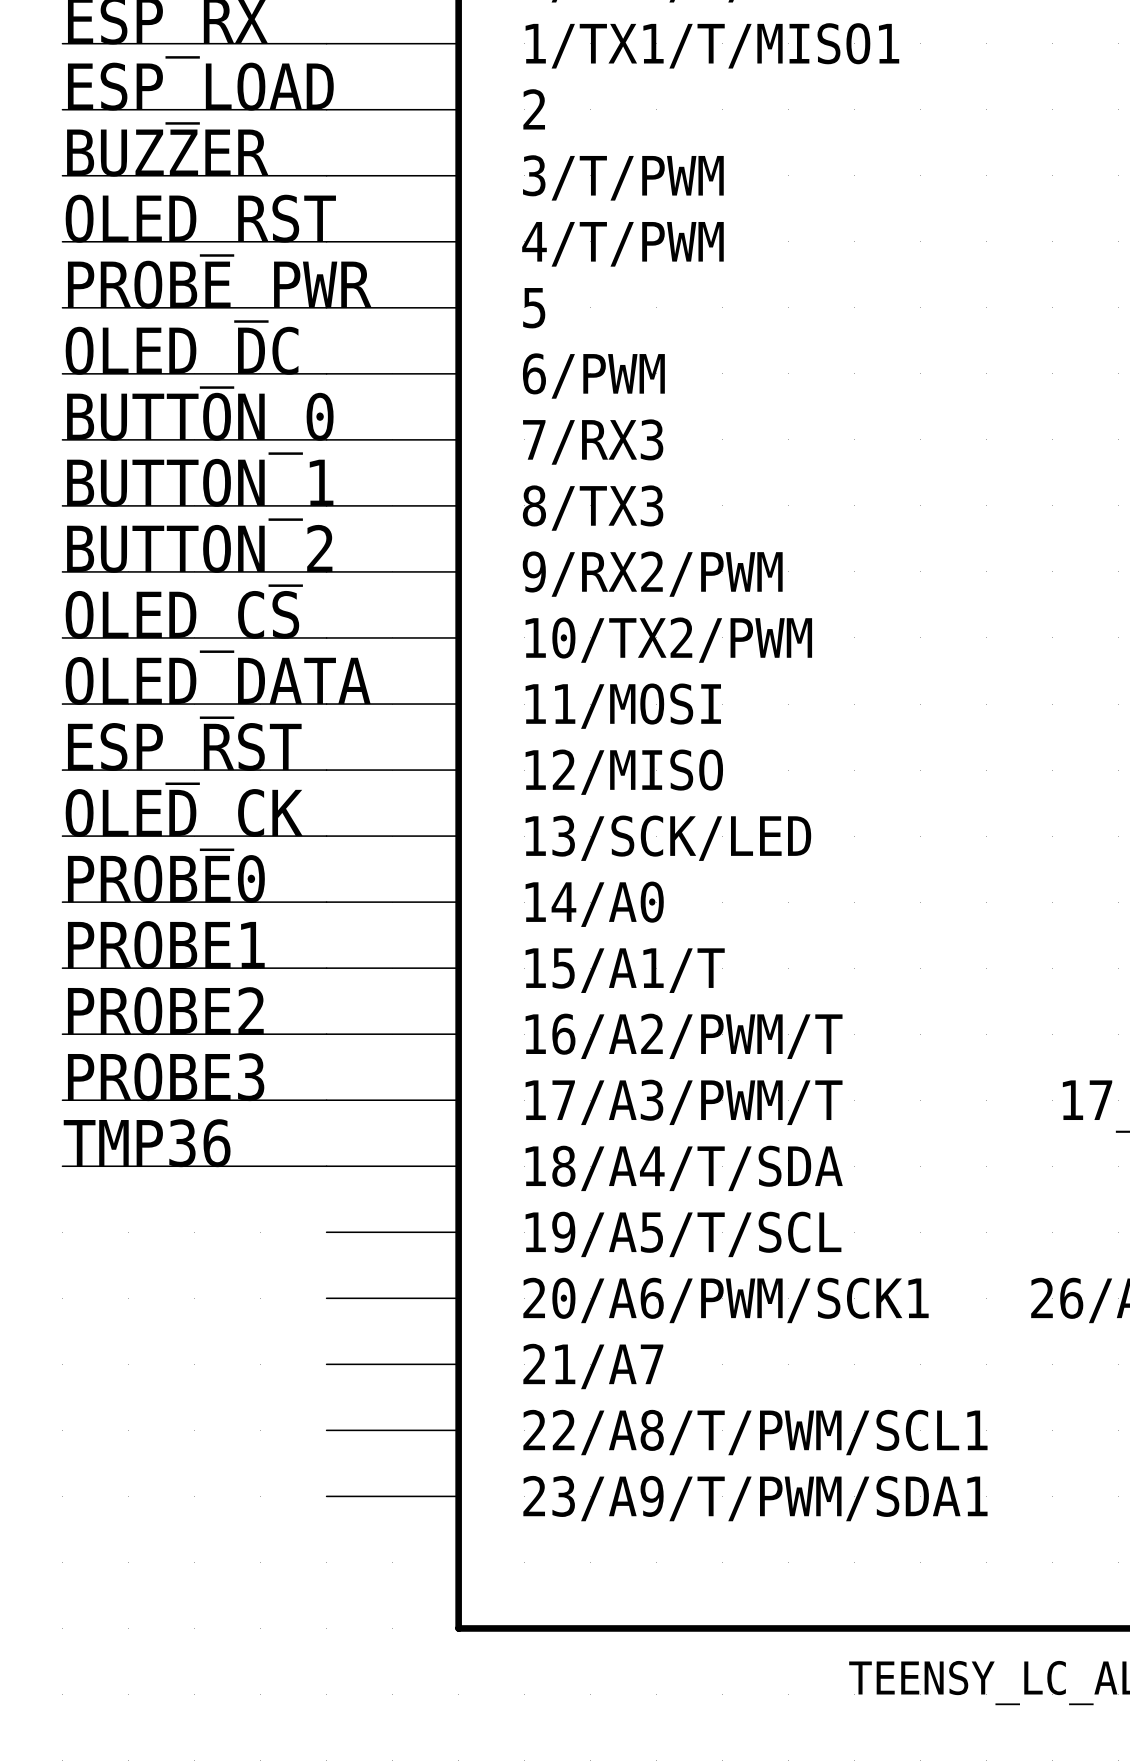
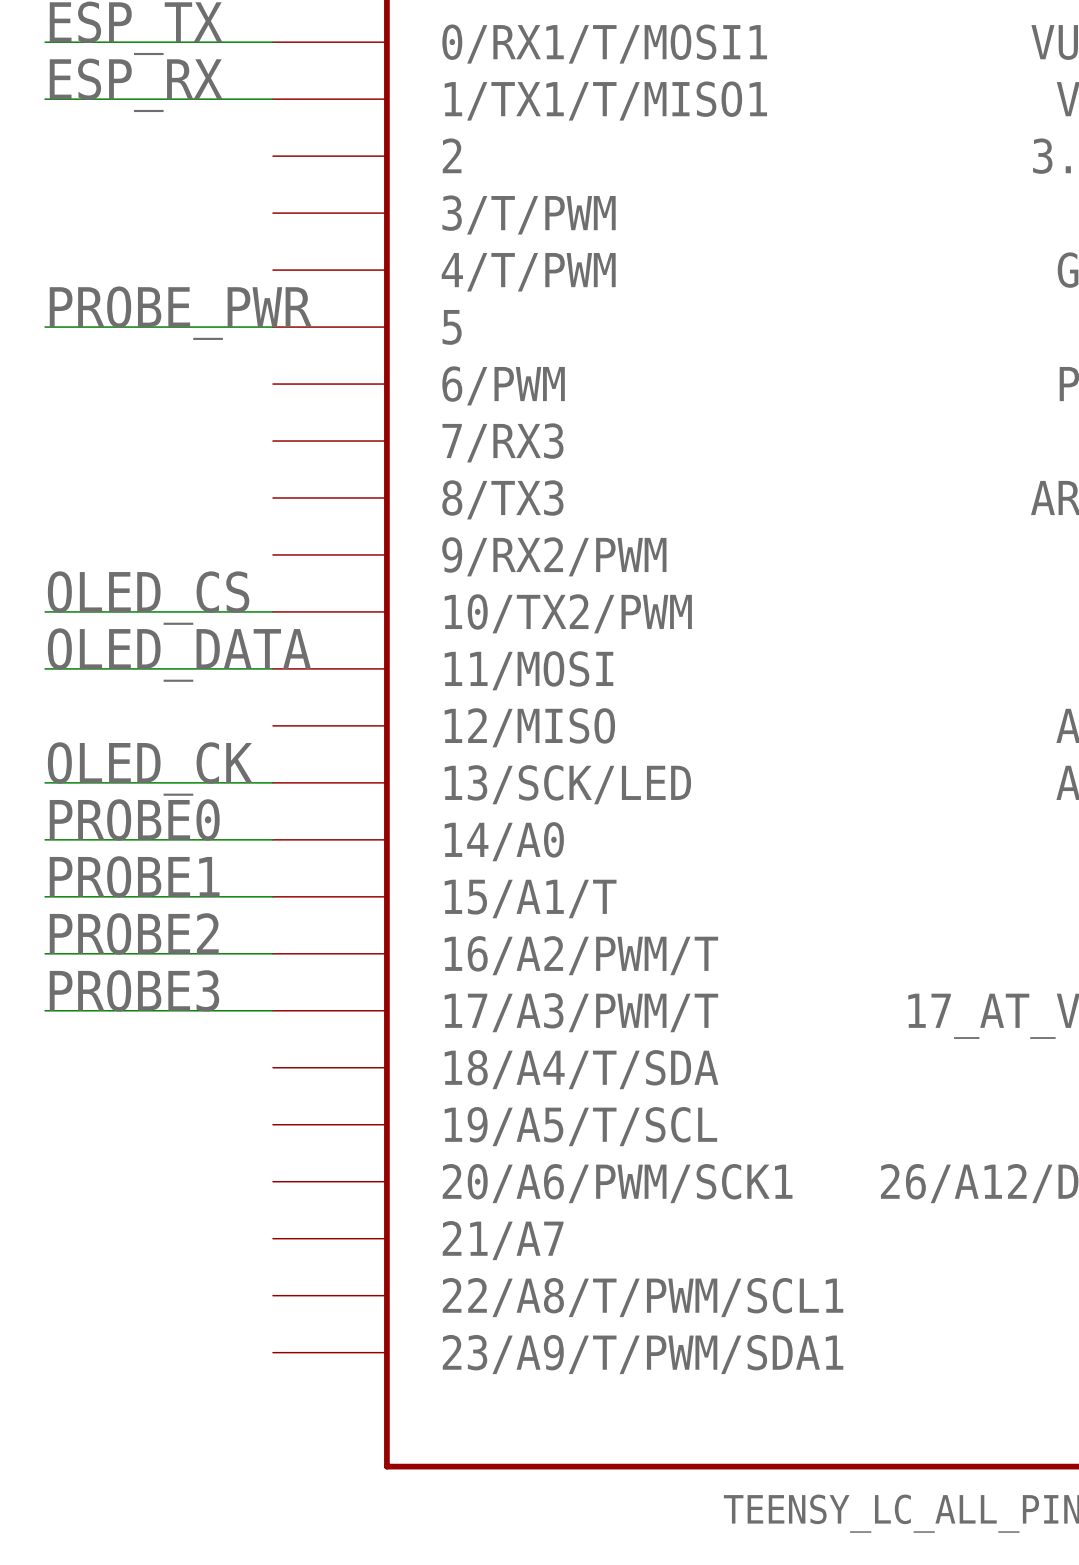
label: ESP_LOAD (200, 93) -> none
wire: (62, 109) (326, 109) -> none
label: BUZZER (167, 153) -> none
wire: (62, 175) (326, 175) -> none
label: OLED_RST (200, 225) -> none
wire: (62, 241) (326, 241) -> none
label: OLED_DC (182, 357) -> none
wire: (62, 373) (326, 373) -> none
label: BUTTON_0 (200, 423) -> none
wire: (62, 439) (326, 439) -> none
label: BUTTON_1 (200, 489) -> none
wire: (62, 505) (326, 505) -> none
label: BUTTON_2 (199, 555) -> none
wire: (62, 571) (326, 571) -> none
label: ESP_RST (184, 753) -> none
wire: (62, 770) (326, 770) -> none
label: TMP36 (147, 1143) -> none
wire: (62, 1166) (326, 1166) -> none

